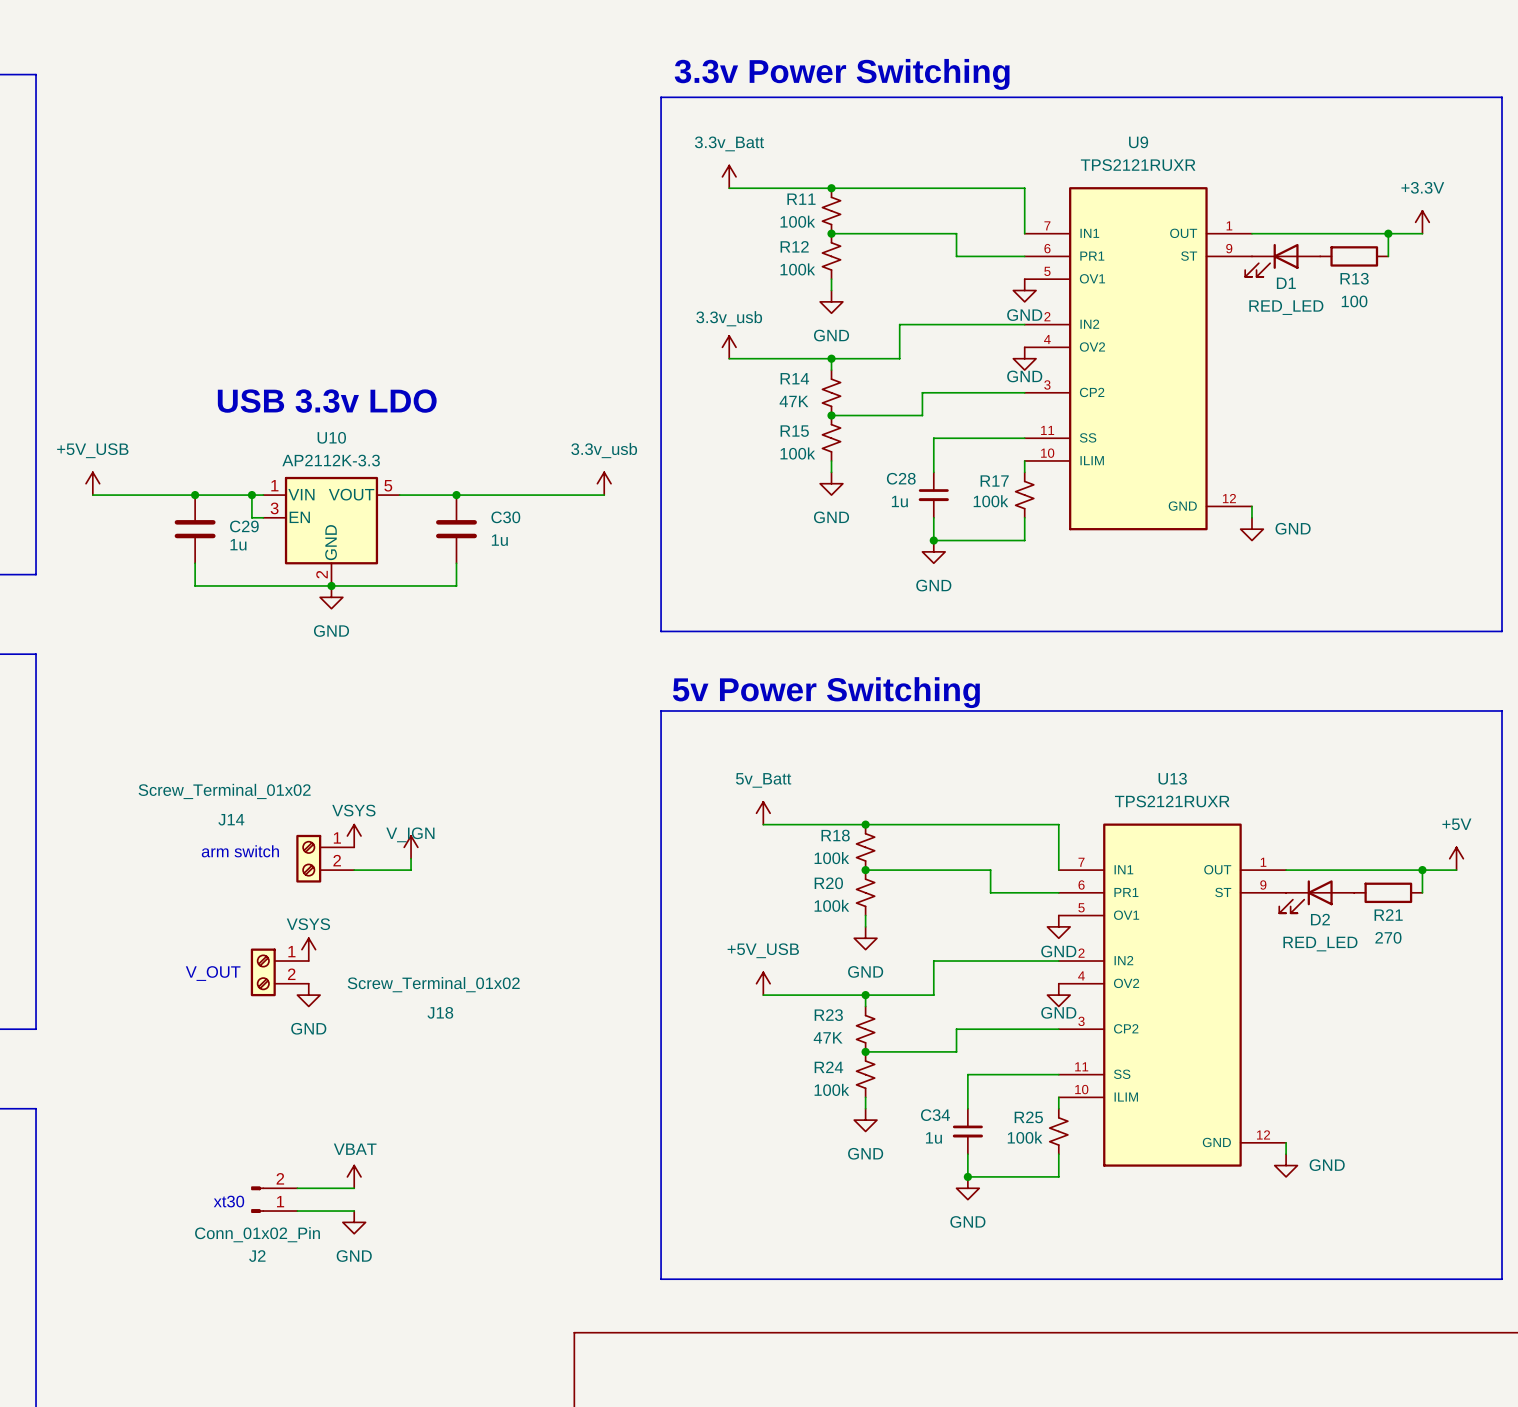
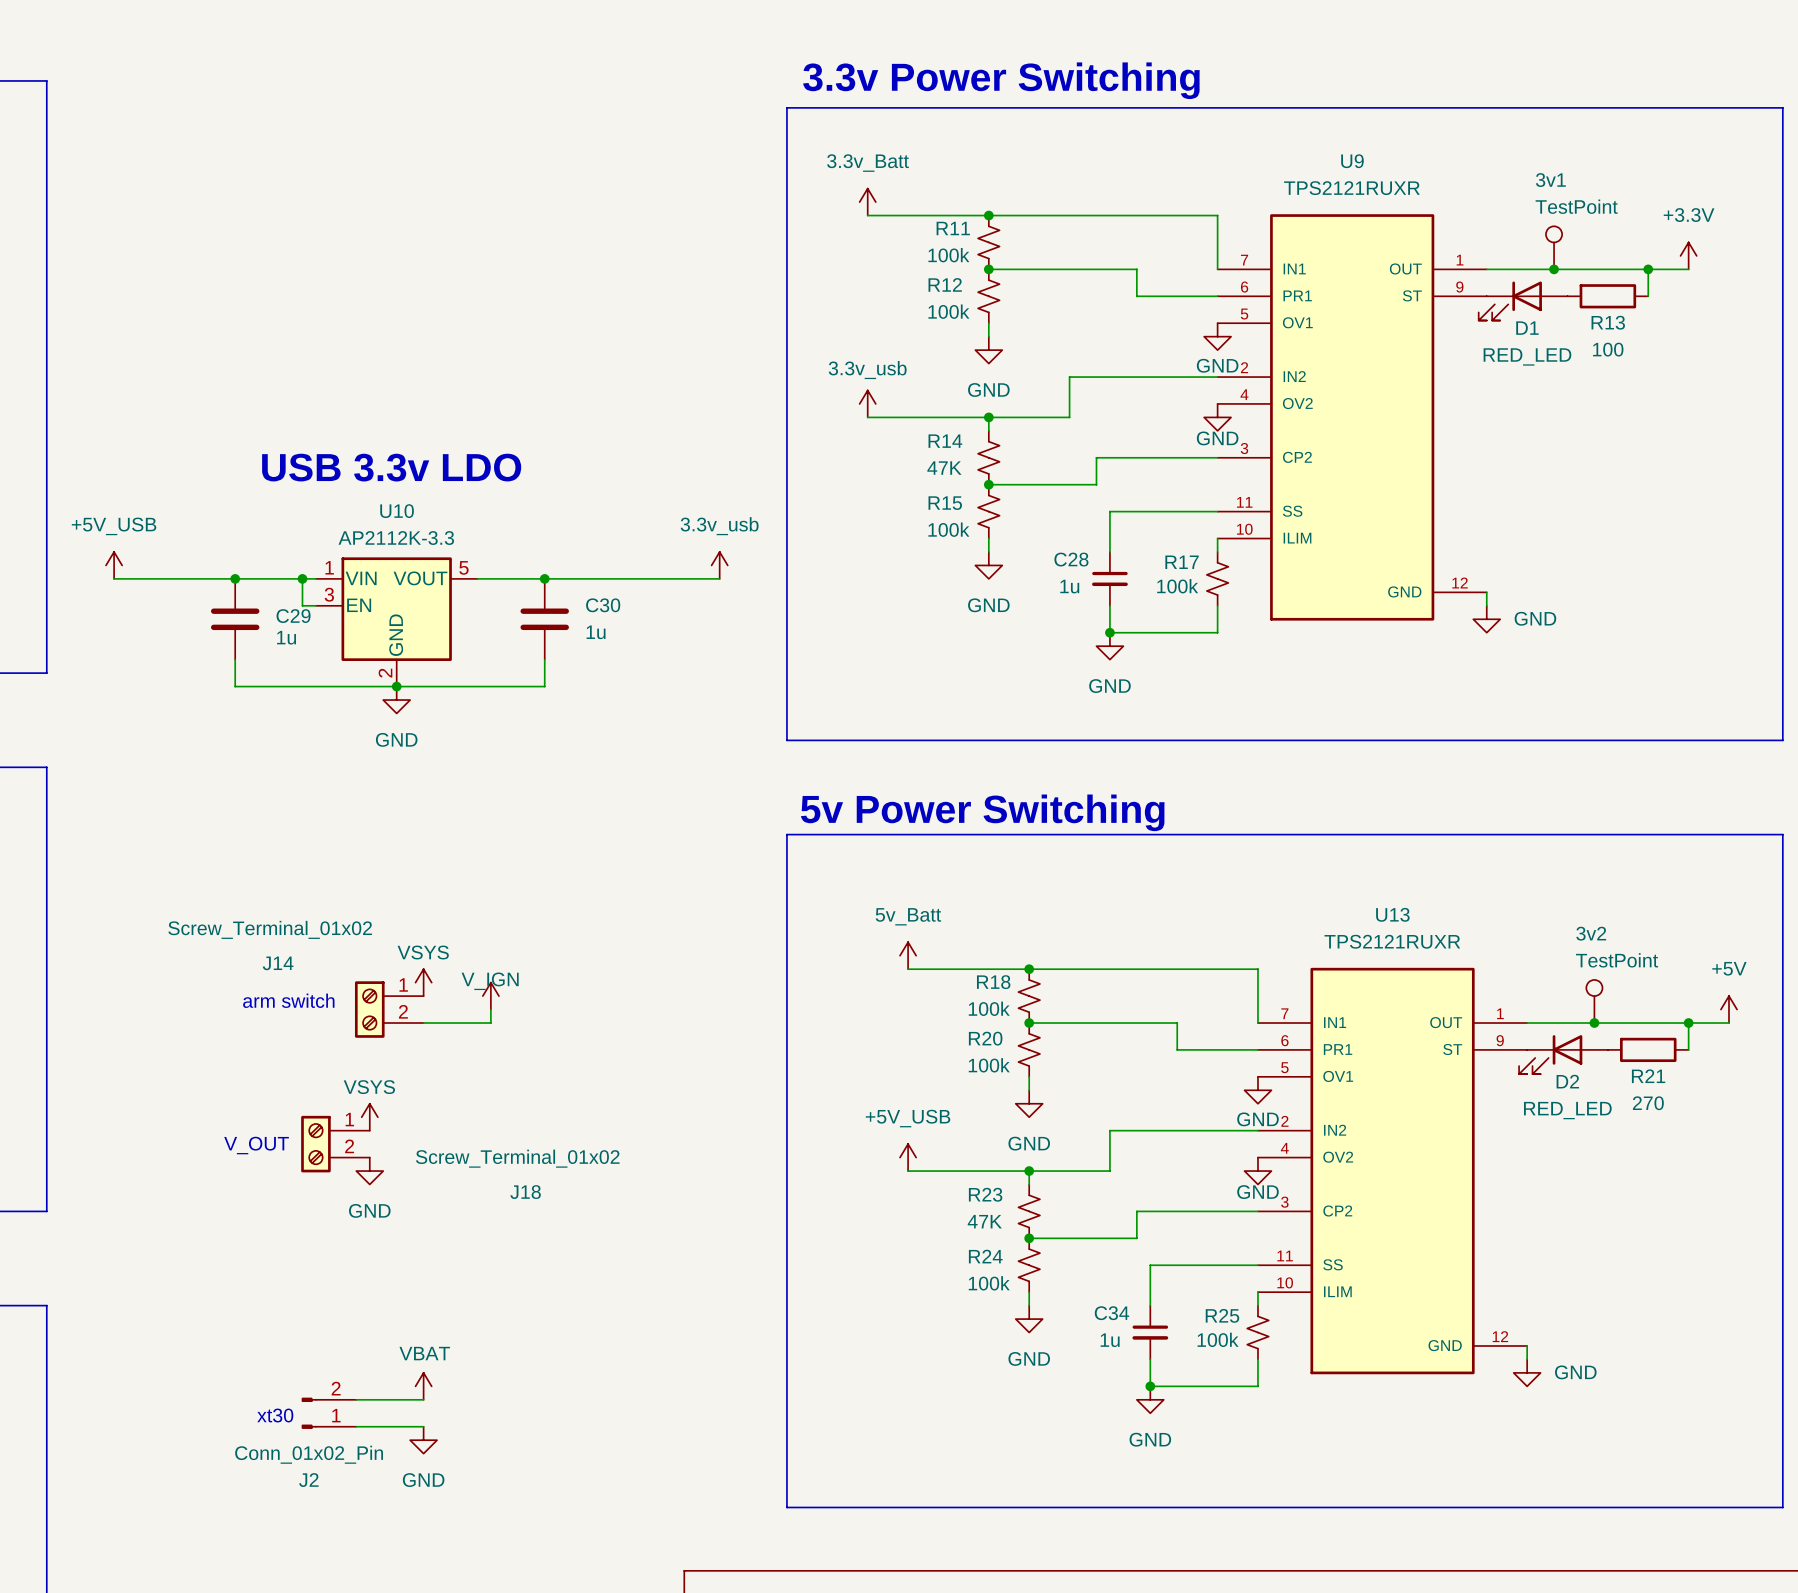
3v1: none -> TestPoint (1554, 247)
junction: none -> (1554, 269)
3v2: none -> TestPoint (1594, 1001)
junction: none -> (1594, 1023)

